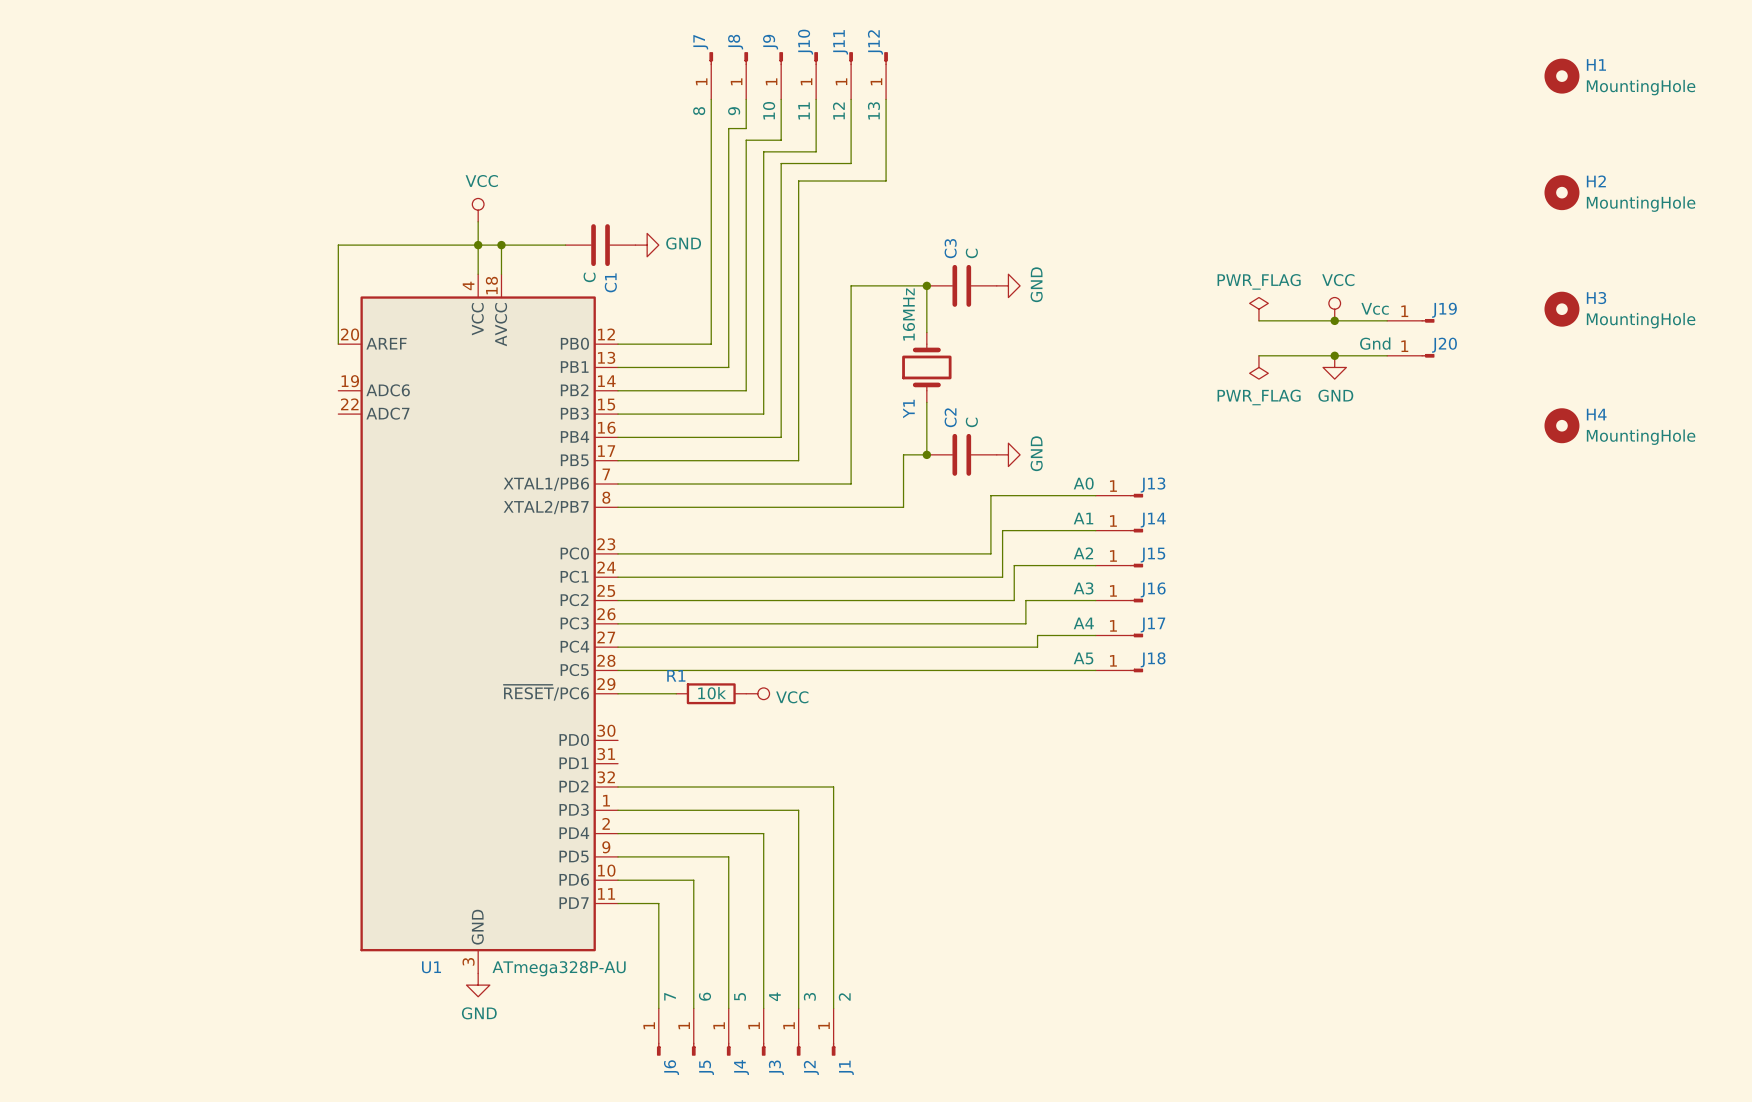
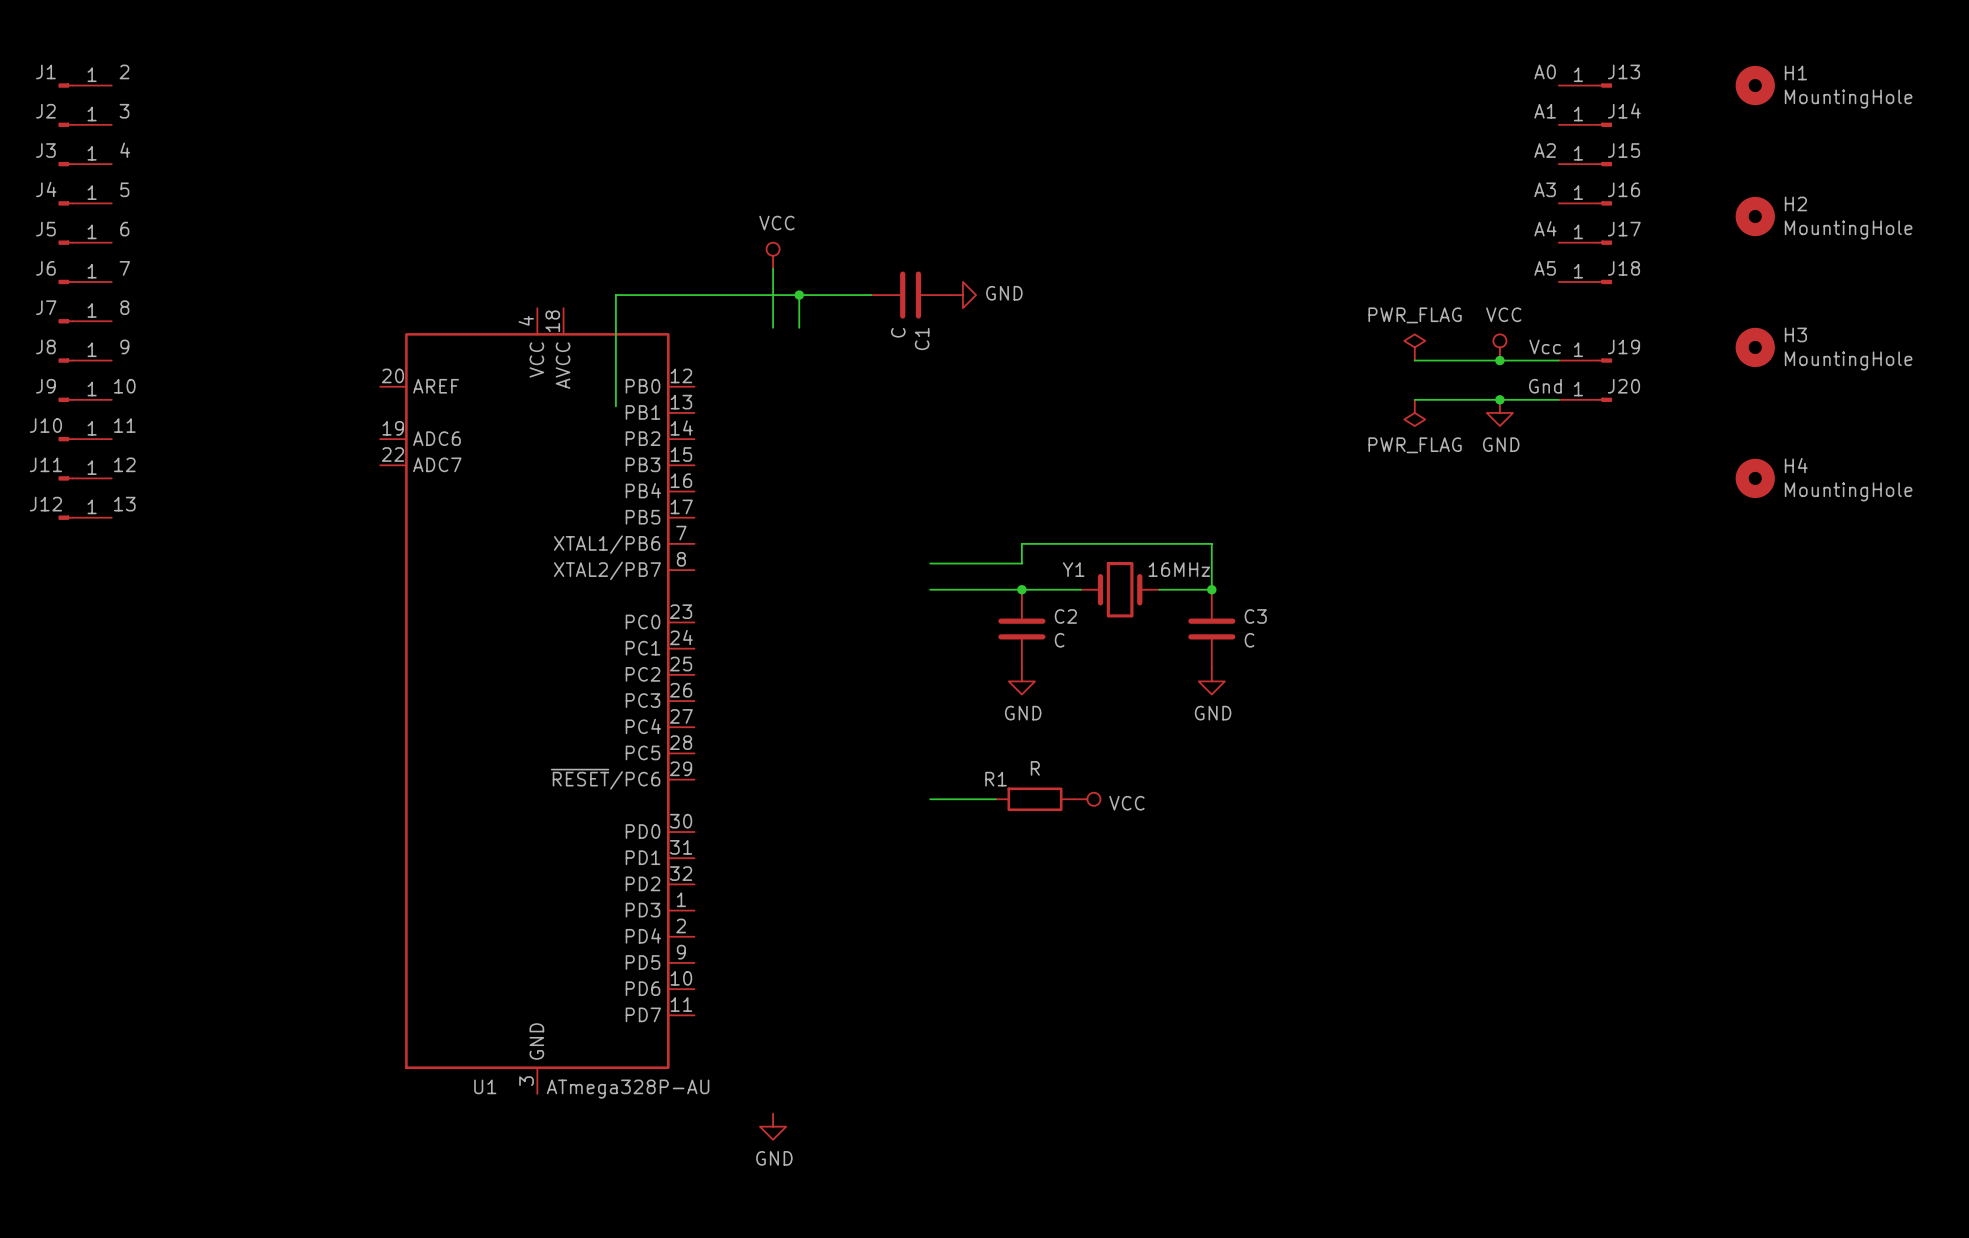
J7 name position: J7 (700, 42) -> J7 (46, 307)
J8 name position: J8 (735, 42) -> J8 (45, 346)
J9 name position: J9 (770, 42) -> J9 (45, 386)
J10 name position: J10 (805, 42) -> J10 (45, 425)
J11 name position: J11 (840, 42) -> J11 (45, 464)
J12 name position: J12 (875, 42) -> J12 (45, 504)
J7 rotation: 0° (711, 58) -> 90° counterclockwise (65, 321)
J8 rotation: 0° (746, 58) -> 90° counterclockwise (65, 360)
J9 rotation: 0° (781, 58) -> 90° counterclockwise (65, 399)
J10 rotation: 0° (816, 58) -> 90° counterclockwise (65, 439)
J11 rotation: 0° (851, 58) -> 90° counterclockwise (65, 478)
J12 rotation: 0° (886, 58) -> 90° counterclockwise (65, 517)
J7 position: (711, 75) -> (85, 321)
J8 position: (746, 75) -> (85, 360)
J9 position: (781, 75) -> (85, 399)
J10 position: (816, 75) -> (85, 439)
J11 position: (851, 75) -> (85, 478)
J12 position: (886, 75) -> (85, 517)
wire: (711, 99) (711, 262) -> none
wire: (746, 99) (746, 128) (728, 128) (728, 367) (618, 367) -> none
wire: (781, 99) (781, 140) (746, 140) (746, 390) (618, 390) -> none
wire: (816, 99) (816, 151) (763, 151) (763, 414) (618, 414) -> none
wire: (851, 99) (851, 163) (781, 163) (781, 437) (618, 437) -> none
wire: (886, 99) (886, 181) (798, 181) (798, 460) (618, 460) -> none
J9 value position: 10 (769, 110) -> 10 (124, 386)
J10 value position: 11 (804, 110) -> 11 (124, 425)
J12 value position: 13 (873, 110) -> 13 (124, 504)
J7 value position: 8 (699, 111) -> 8 (124, 307)
J8 value position: 9 (734, 111) -> 9 (124, 346)
J11 value position: 12 (838, 111) -> 12 (124, 464)
power symbol position: VCC (478, 210) -> VCC (773, 255)
wire: (478, 221) (478, 274) -> (773, 268) (773, 327)
junction: (478, 245) -> none
wire: (501, 245) (501, 274) -> none
junction: (501, 245) -> none
wire: (565, 245) (338, 245) (338, 344) -> (871, 295) (615, 295) (615, 406)
C1 position: (600, 245) -> (910, 295)
power symbol: GND (647, 245) -> none
junction: none -> (799, 295)
power symbol: none -> GND (962, 295)
junction: (926, 285) -> none
C3 rotation: 0° (961, 285) -> 90° clockwise (1211, 629)
C3 position: (961, 285) -> (1211, 629)
power symbol: GND (1008, 285) -> none
wire: (711, 291) (711, 344) (618, 344) -> none
wire: (926, 332) (926, 285) (851, 285) (851, 484) (618, 484) -> none
Y1 rotation: 0° (926, 367) -> 90° clockwise (1120, 589)
Y1 position: (926, 367) -> (1120, 589)
wire: (926, 402) (926, 454) (903, 454) (903, 507) (618, 507) -> none
junction: (926, 454) -> none
C2 rotation: 0° (961, 454) -> 90° clockwise (1021, 629)
C2 position: (961, 454) -> (1021, 629)
power symbol: GND (1008, 454) -> none
wire: (1095, 495) (990, 495) (990, 553) (618, 553) -> none
J13 position: (1119, 495) -> (1585, 85)
wire: none -> (930, 563) (1021, 563) (1021, 543) (1211, 543) (1211, 589) (1159, 589)
wire: none -> (930, 589) (1080, 589)
junction: none -> (1021, 589)
junction: none -> (1211, 589)
wire: (1095, 530) (1002, 530) (1002, 577) (618, 577) -> none
J14 position: (1119, 530) -> (1585, 124)
wire: (1095, 565) (1014, 565) (1014, 600) (618, 600) -> none
J15 position: (1119, 565) -> (1585, 164)
wire: (1095, 600) (1025, 600) (1025, 623) (618, 623) -> none
J16 position: (1119, 600) -> (1585, 203)
power symbol: none -> GND (1021, 681)
power symbol: none -> GND (1211, 681)
wire: (1095, 635) (1037, 635) (1037, 647) (618, 647) -> none
J17 position: (1119, 635) -> (1585, 242)
wire: (618, 670) (1095, 670) -> none
J18 position: (1119, 670) -> (1585, 281)
wire: (618, 693) (676, 693) -> (930, 799) (995, 799)
R1 position: (711, 693) -> (1034, 799)
R1 value: 10k (712, 693) -> R (1035, 768)
power symbol position: VCC (757, 693) -> VCC (1087, 799)
wire: (618, 786) (833, 786) (833, 1008) -> none
wire: (618, 810) (798, 810) (798, 1008) -> none
wire: (618, 833) (763, 833) (763, 1008) -> none
wire: (618, 856) (728, 856) (728, 1008) -> none
wire: (618, 880) (693, 880) (693, 1008) -> none
wire: (618, 903) (658, 903) (658, 1008) -> none
power symbol position: GND (478, 985) -> GND (773, 1126)
J6 value position: 7 (670, 996) -> 7 (124, 268)
J5 value position: 6 (704, 996) -> 6 (124, 229)
J4 value position: 5 (740, 996) -> 5 (124, 189)
J3 value position: 4 (774, 996) -> 4 (125, 150)
J2 value position: 3 (809, 996) -> 3 (124, 111)
J1 value position: 2 (844, 996) -> 2 (124, 71)
J6 position: (658, 1032) -> (85, 281)
J5 position: (693, 1032) -> (85, 242)
J4 position: (728, 1032) -> (85, 203)
J3 position: (763, 1032) -> (85, 164)
J2 position: (798, 1032) -> (85, 124)
J1 position: (833, 1032) -> (85, 85)
J6 rotation: 0° (658, 1049) -> 90° clockwise (65, 281)
J5 rotation: 0° (693, 1049) -> 90° clockwise (65, 242)
J4 rotation: 0° (728, 1049) -> 90° clockwise (65, 203)
J3 rotation: 0° (763, 1049) -> 90° clockwise (65, 164)
J2 rotation: 0° (798, 1049) -> 90° clockwise (65, 124)
J1 rotation: 0° (833, 1049) -> 90° clockwise (65, 85)
J6 name position: J6 (671, 1067) -> J6 (45, 268)
J5 name position: J5 (706, 1067) -> J5 (45, 229)
J4 name position: J4 (741, 1067) -> J4 (46, 189)
J3 name position: J3 (776, 1067) -> J3 (45, 150)
J2 name position: J2 (811, 1067) -> J2 (45, 111)
J1 name position: J1 (846, 1067) -> J1 (45, 71)

